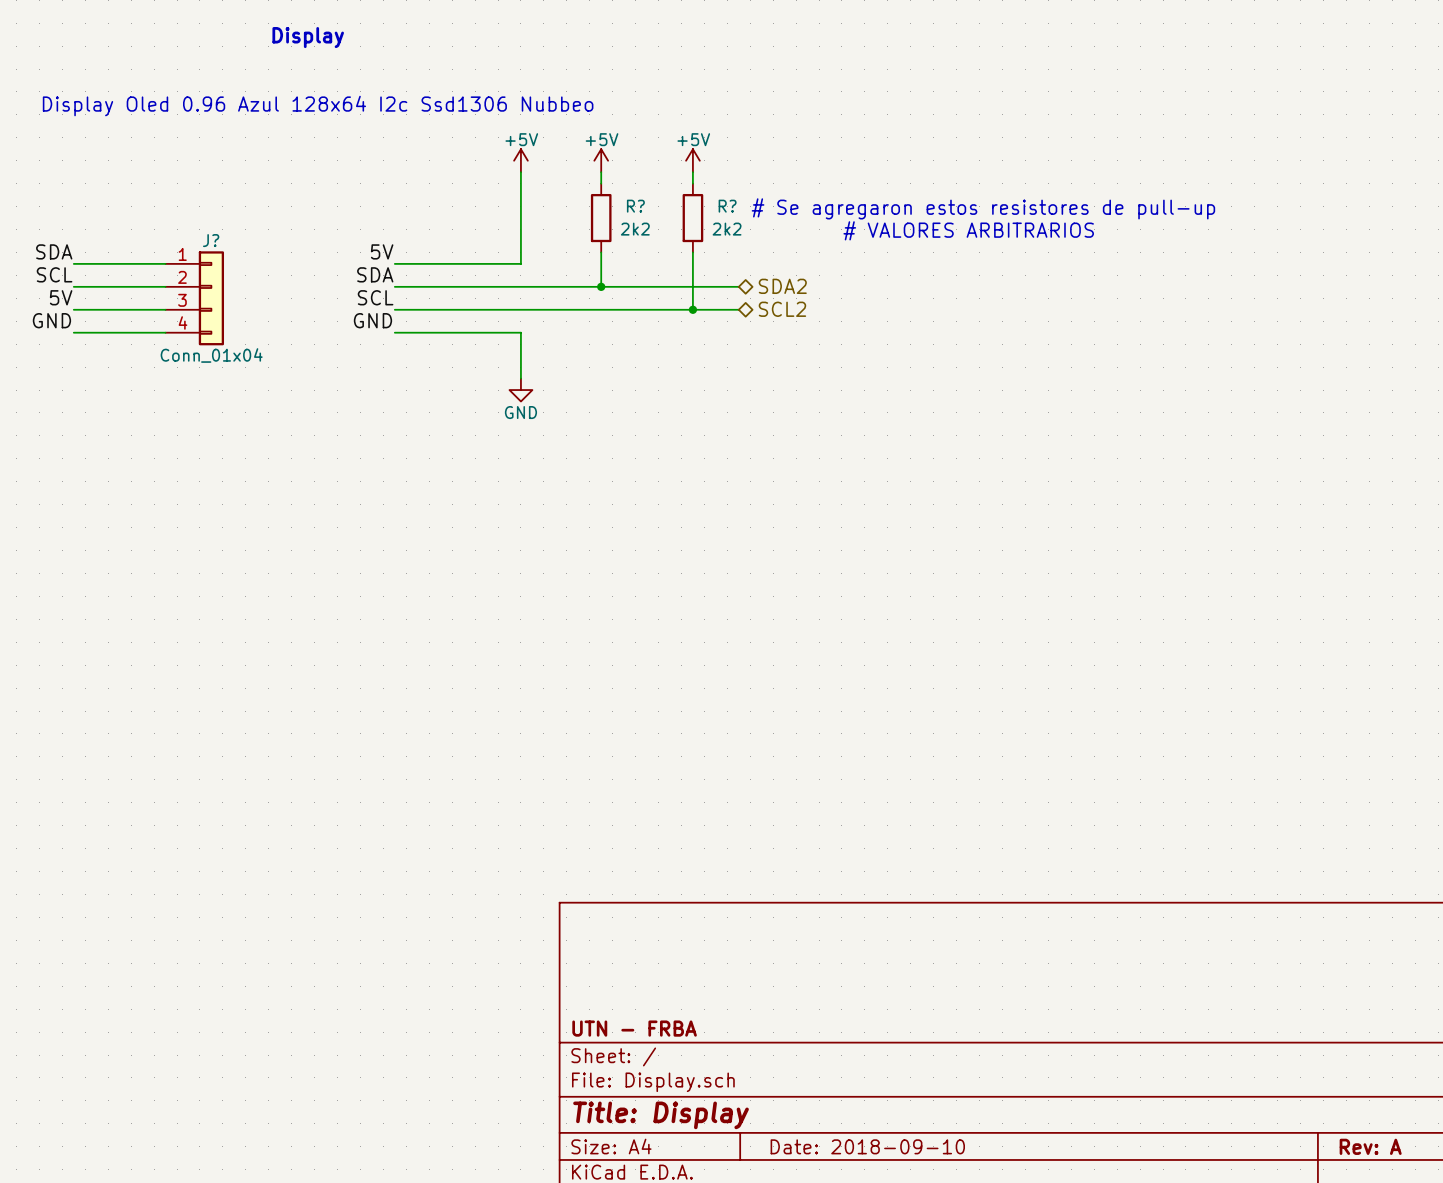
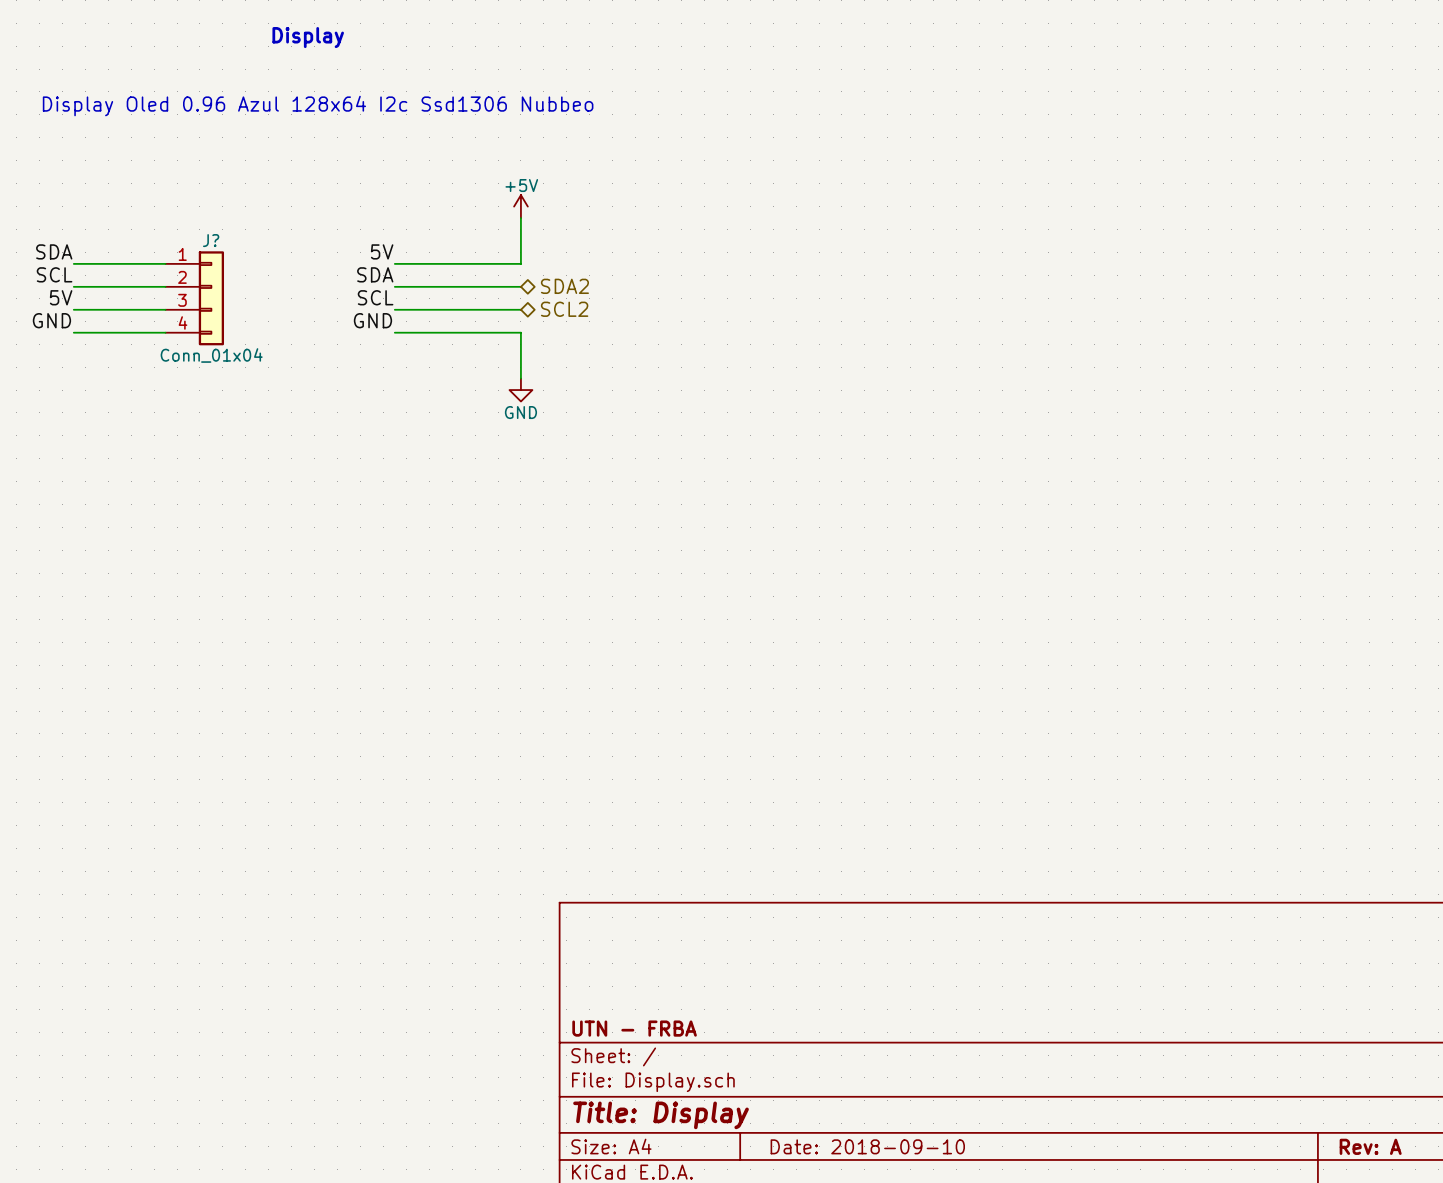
power symbol position: +5V (520, 160) -> +5V (520, 206)
power symbol: +5V (601, 160) -> none
power symbol: +5V (692, 160) -> none
wire: (601, 172) (601, 183) -> none
wire: (692, 172) (692, 183) -> none
text: # Se agregaron estos resistores de pull-up (983, 208) -> none
R?: 2k2 (601, 218) -> none
R?: 2k2 (692, 218) -> none
text: # VALORES ARBITRARIOS (968, 230) -> none
wire: (601, 252) (601, 286) -> none
wire: (692, 252) (692, 309) -> none
wire: (520, 286) (738, 286) -> none
junction: (601, 286) -> none
hierarchical label position: SDA2 (782, 286) -> SDA2 (564, 286)
wire: (520, 309) (738, 309) -> none
junction: (692, 309) -> none
hierarchical label position: SCL2 (782, 309) -> SCL2 (564, 309)

